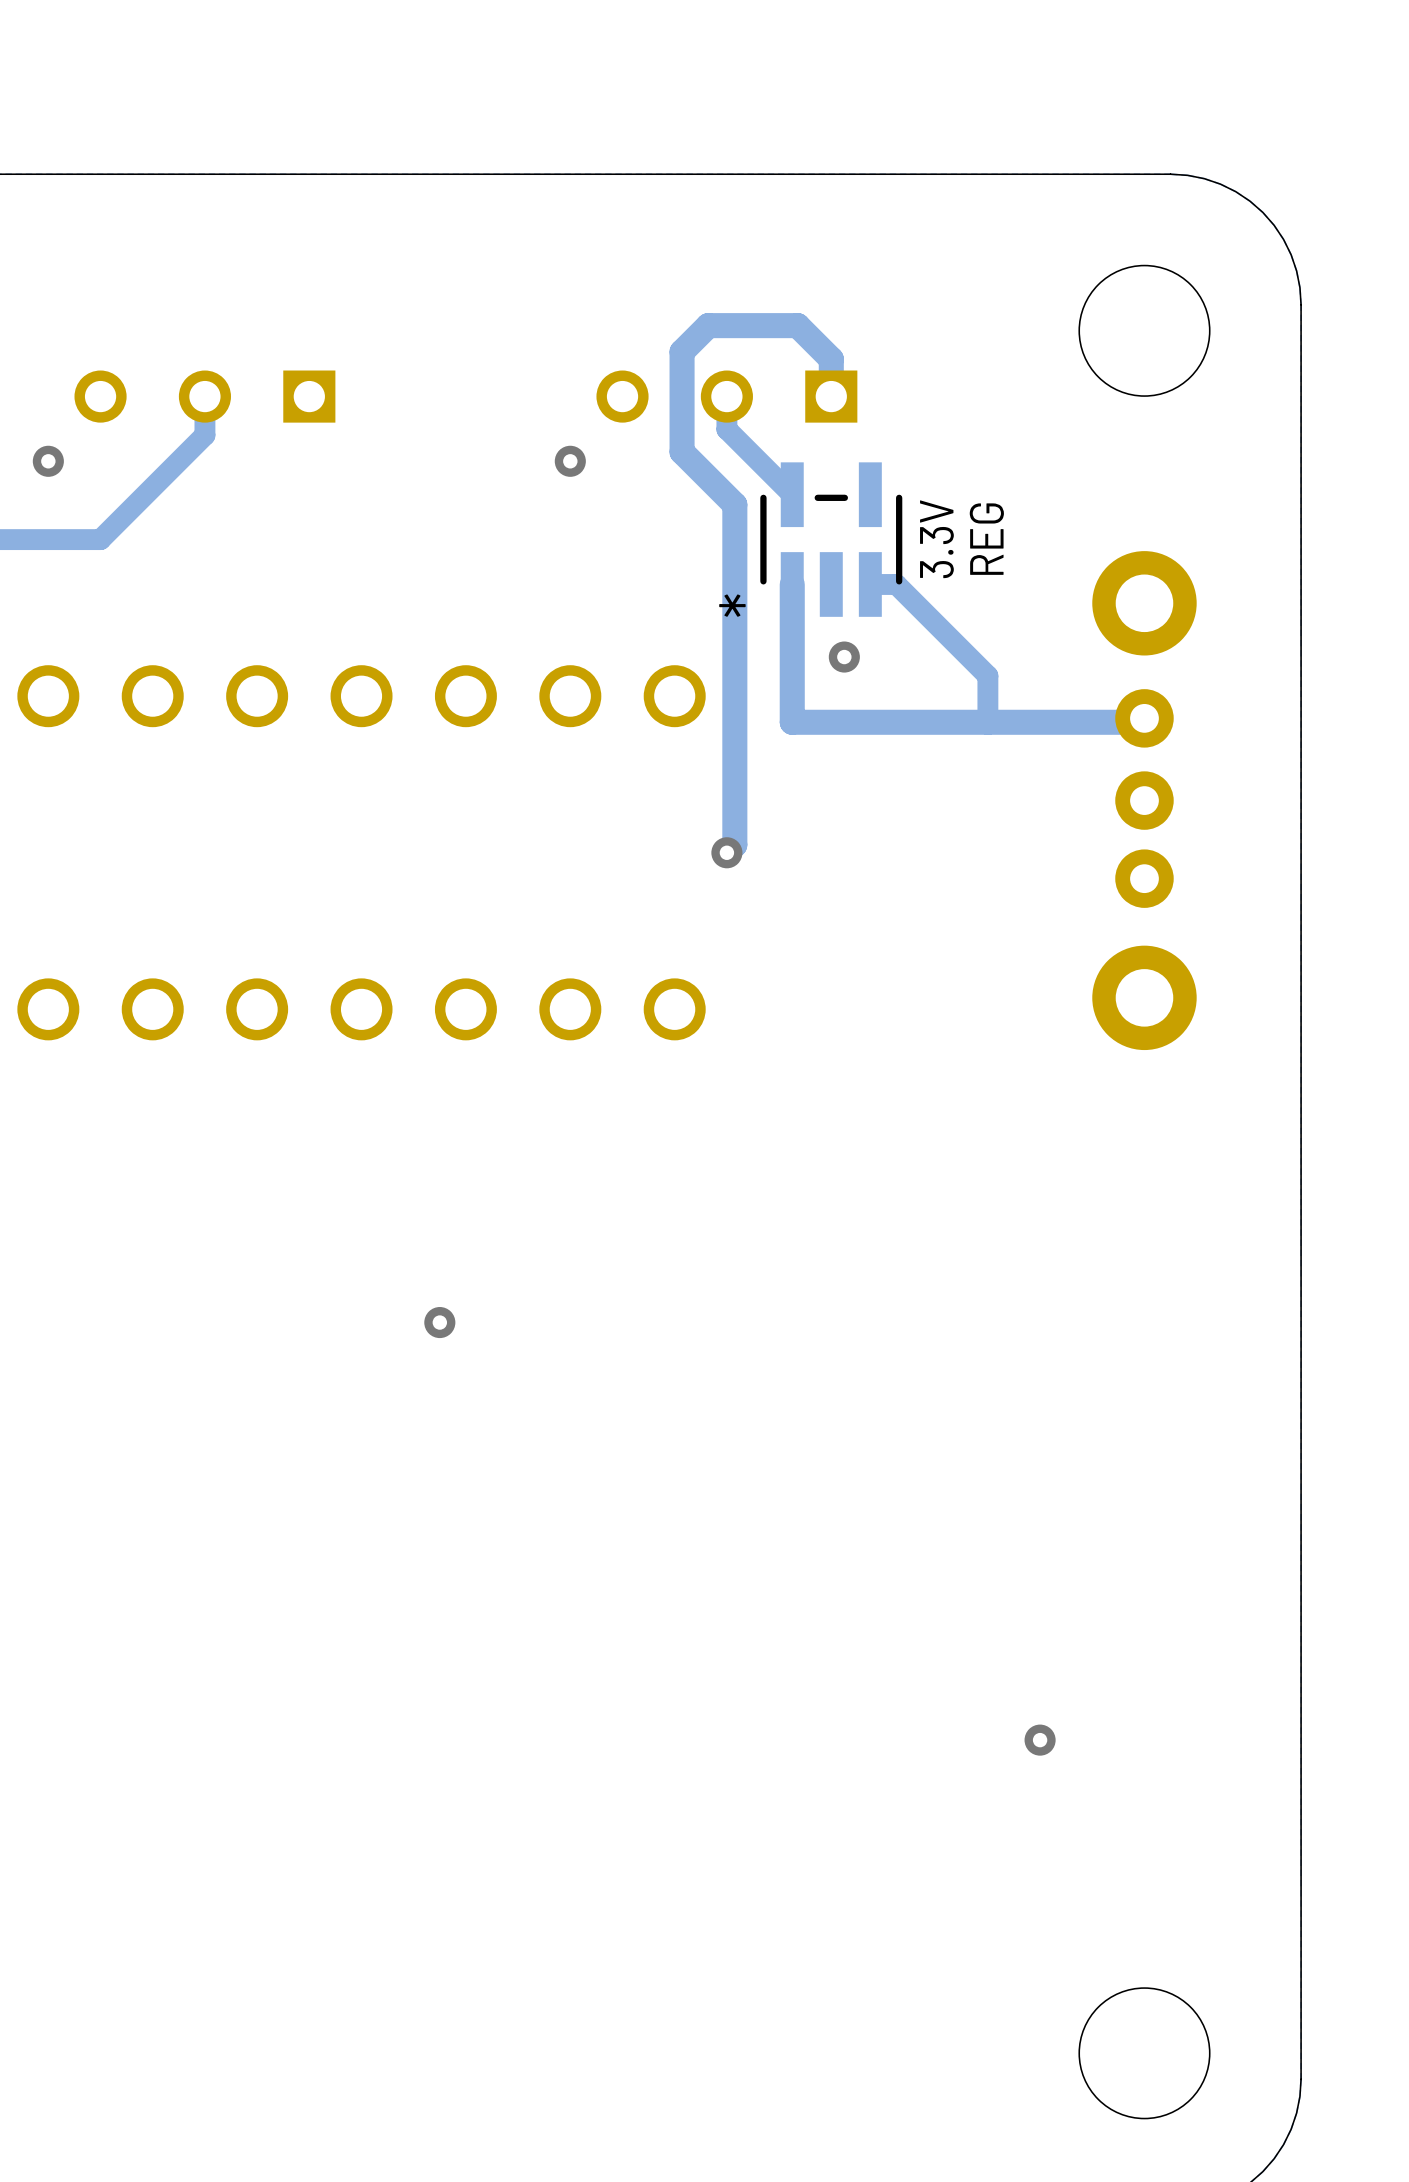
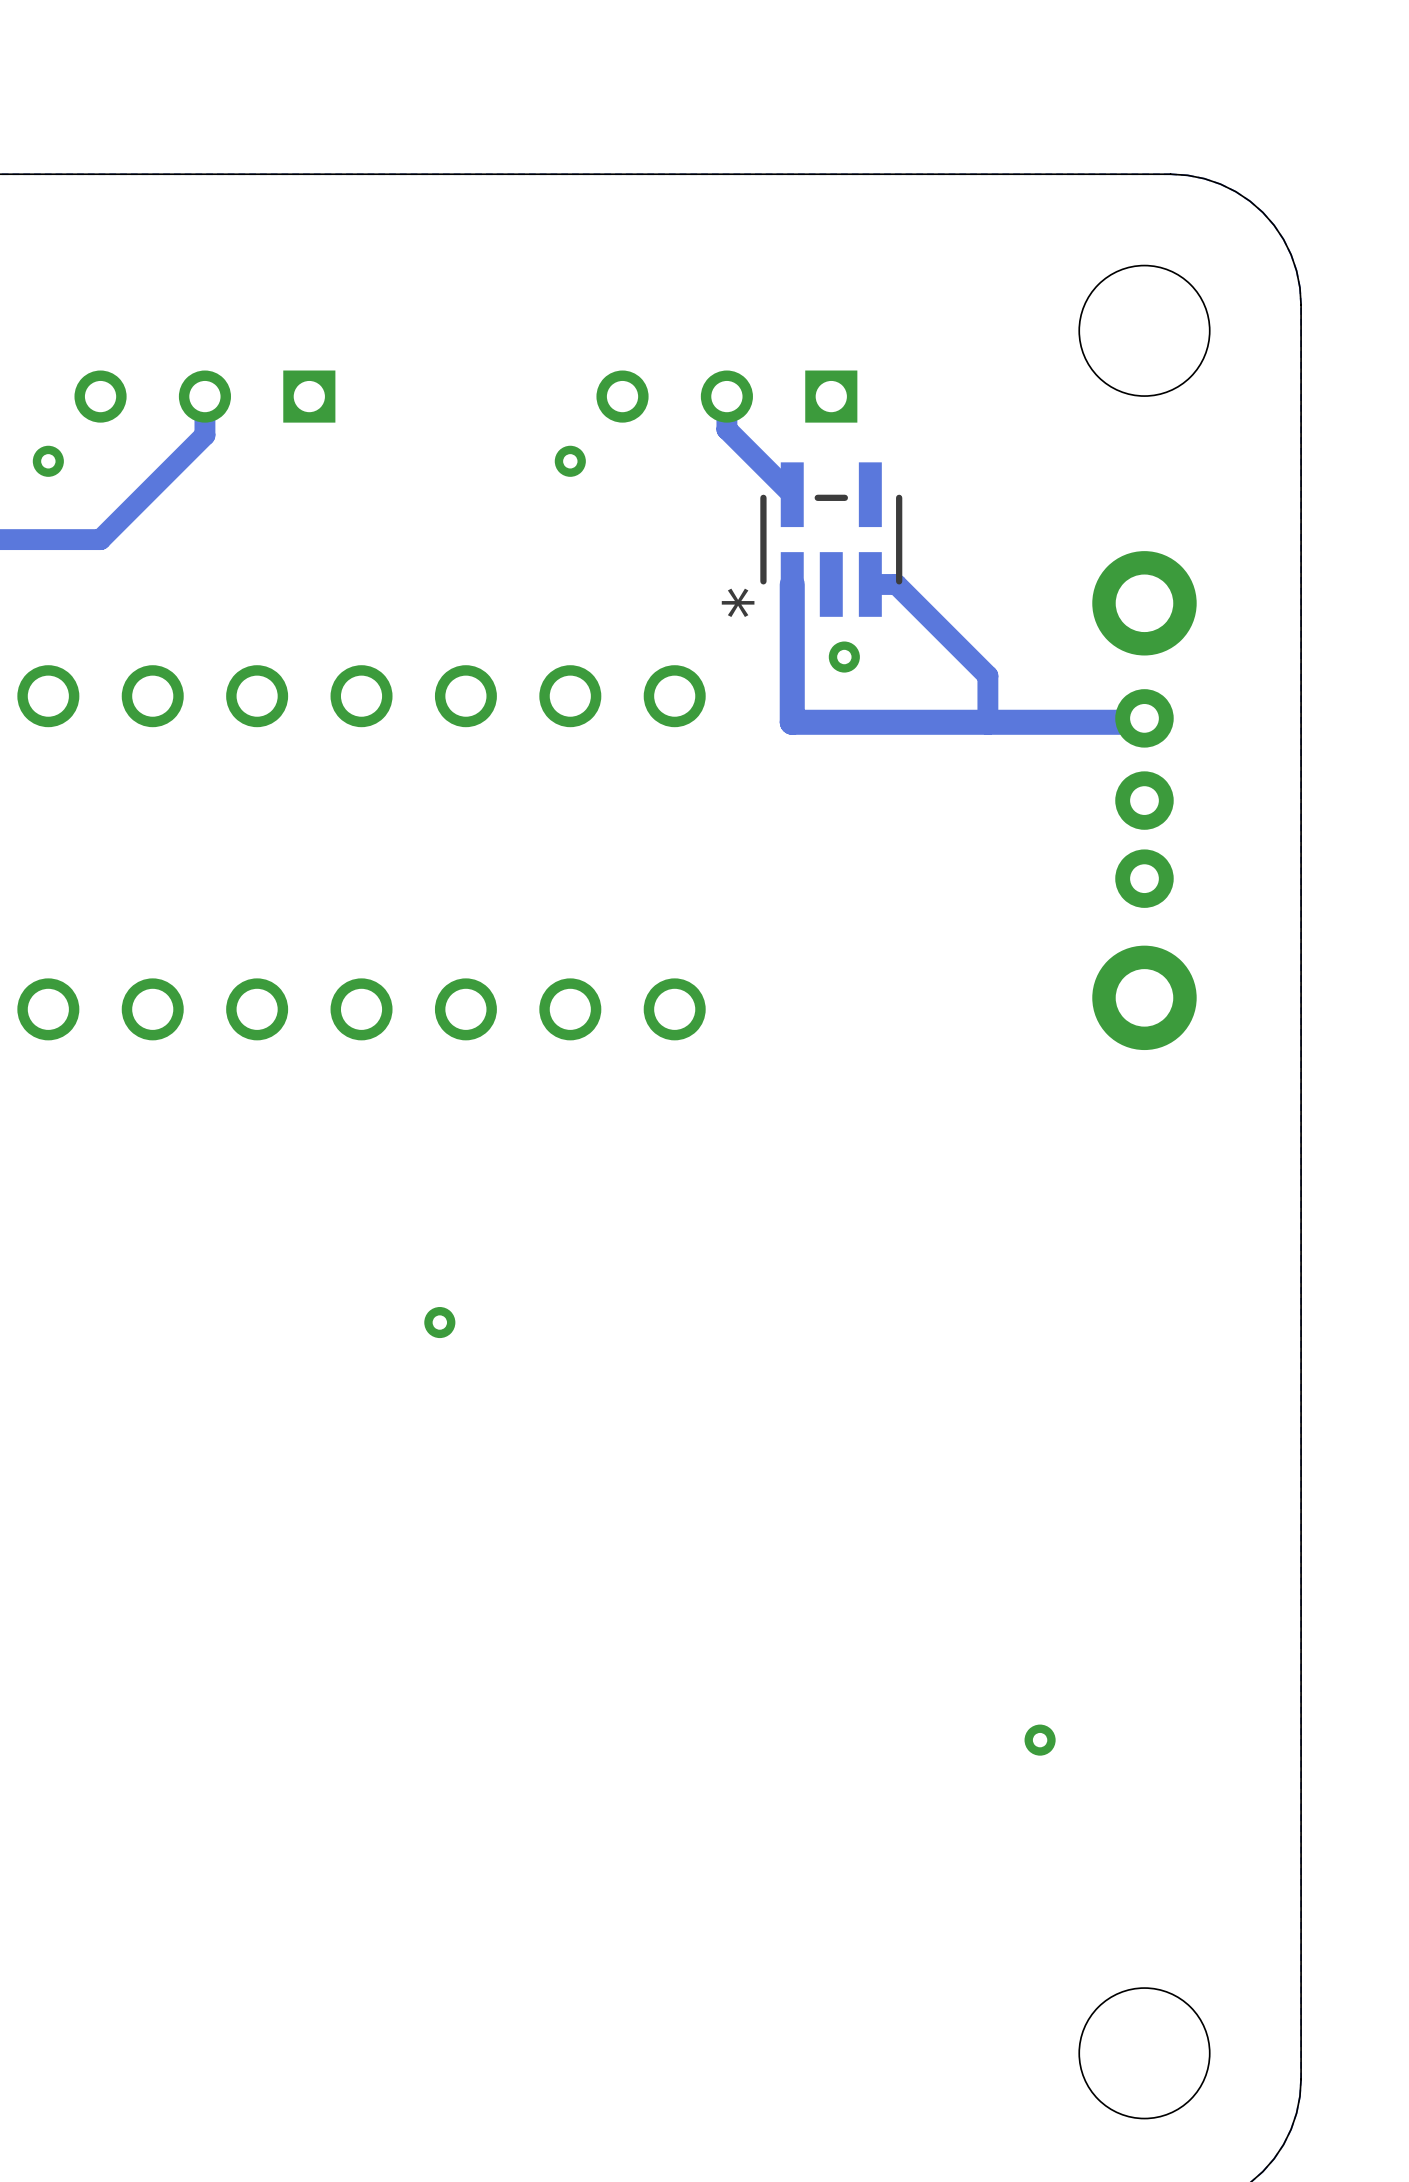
track: (831, 396) (831, 359) (797, 325) (708, 325) (682, 351) (682, 451) (734, 504) (734, 844) (726, 852) -> none
text: 3.3V (936, 539) -> none
text: REG (986, 539) -> none
via: (726, 852) -> none

